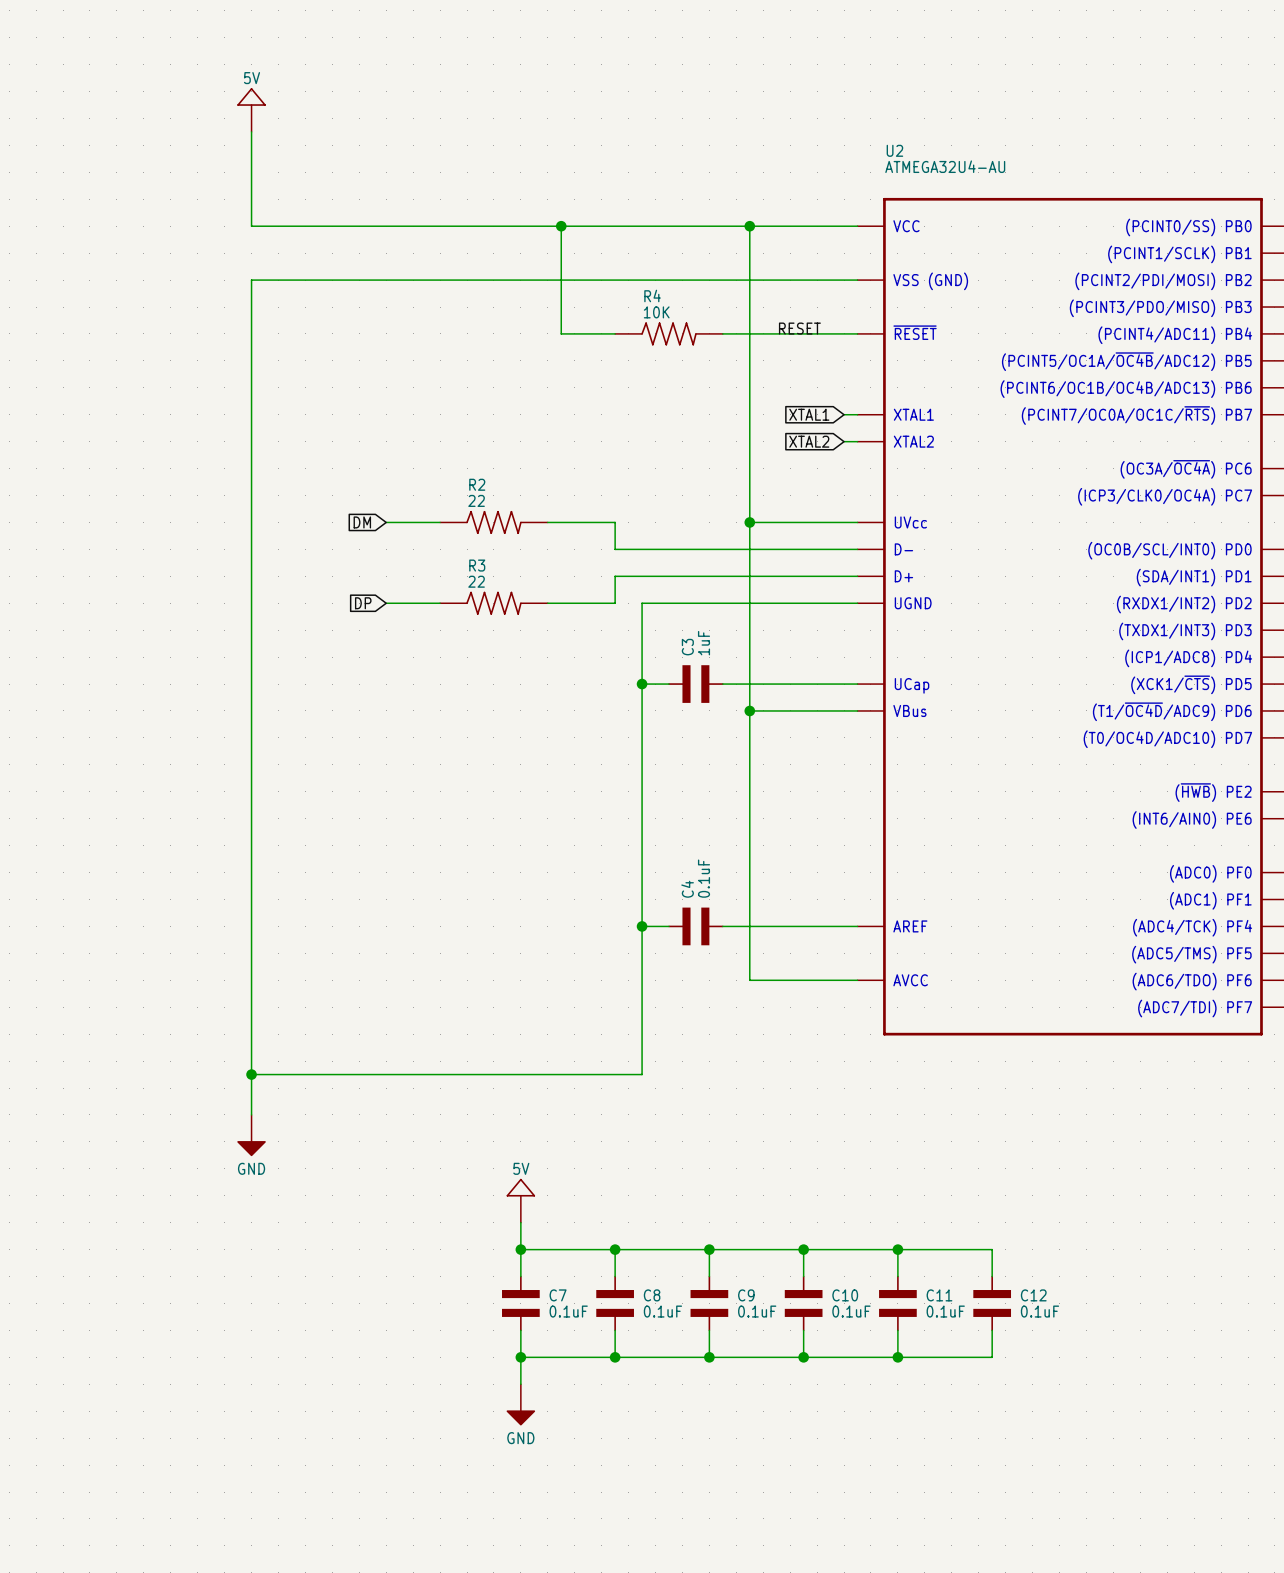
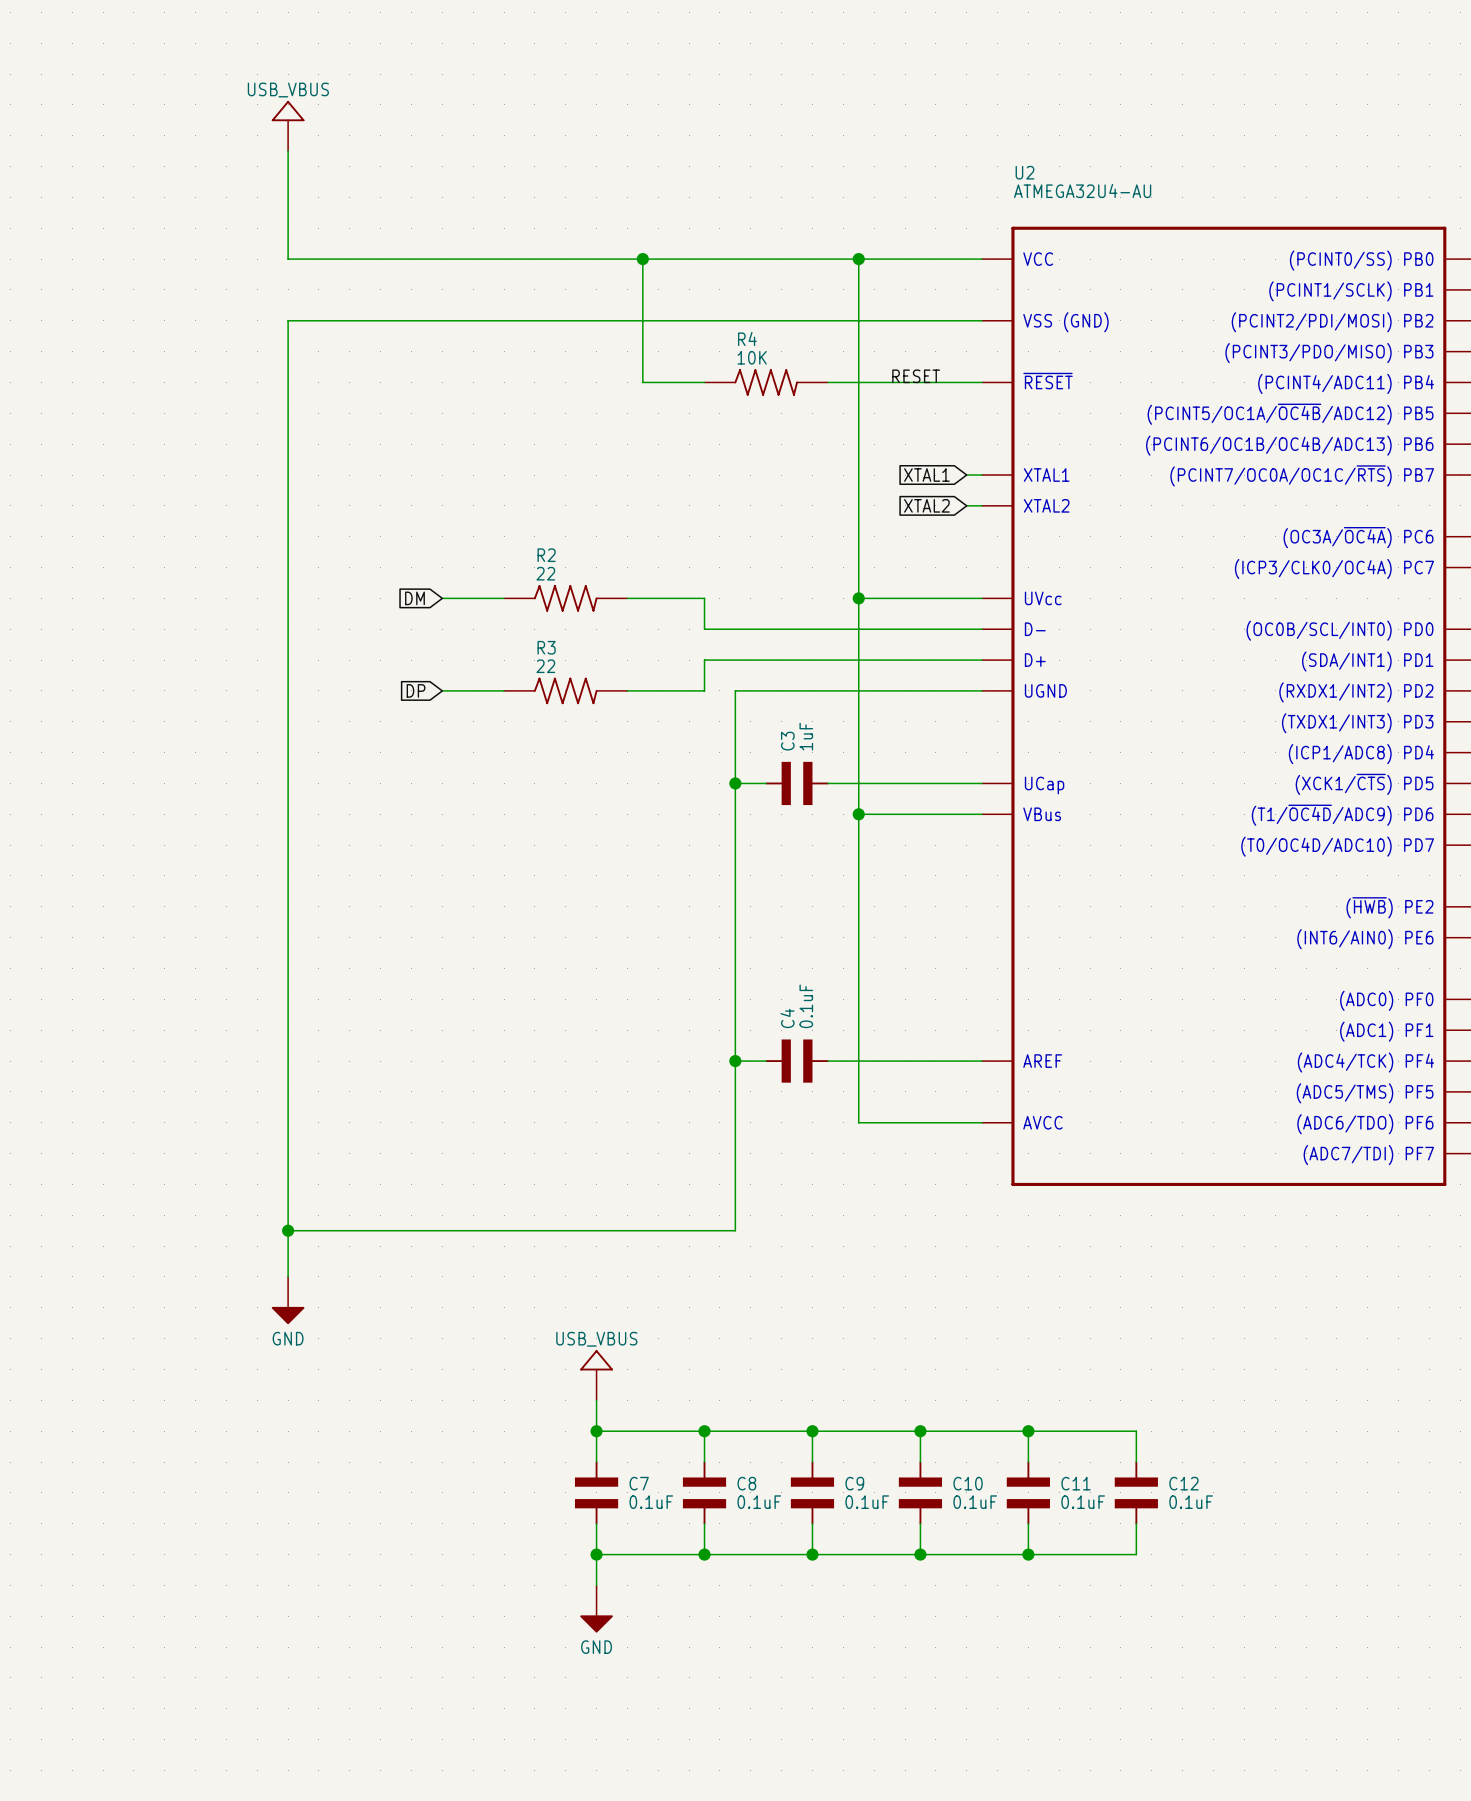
power symbol: 5V (251, 110) -> USB_VBUS (288, 125)
power symbol: 5V (520, 1200) -> USB_VBUS (596, 1375)

